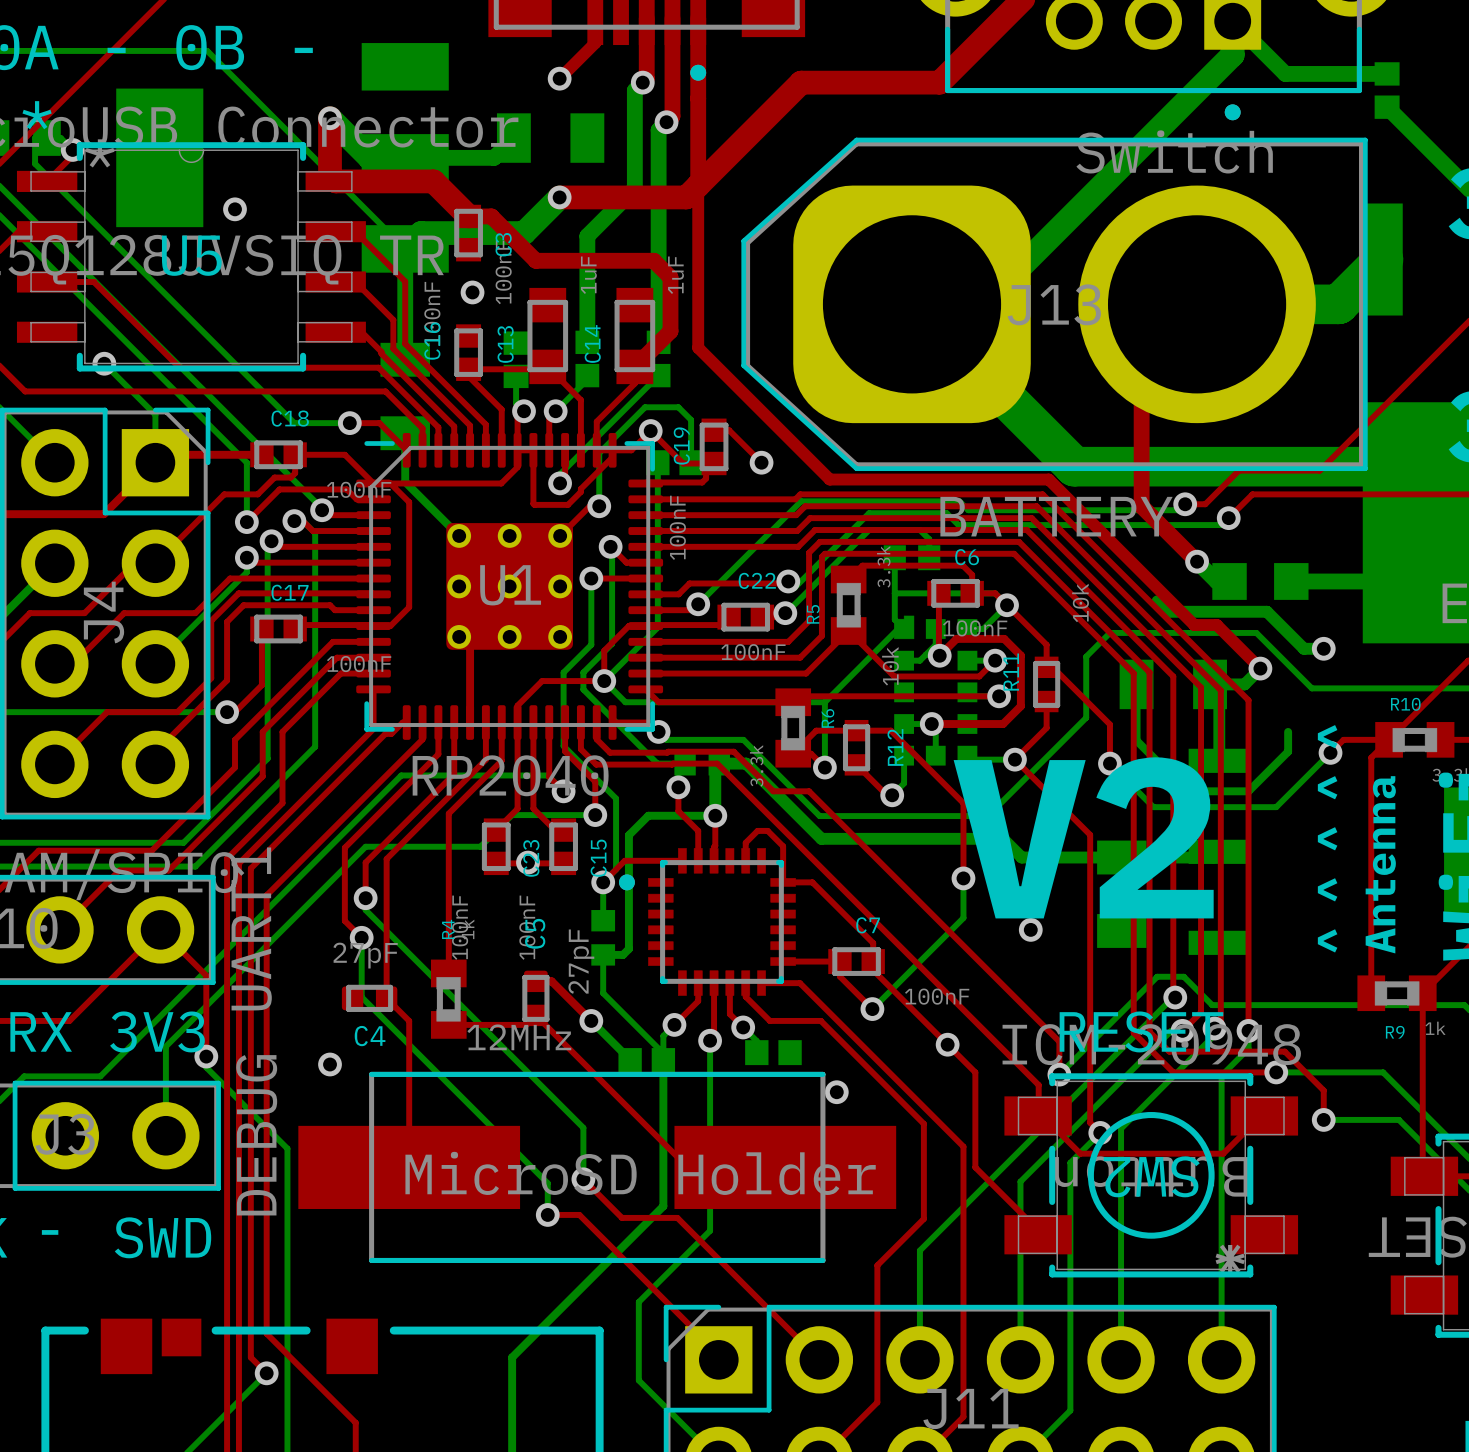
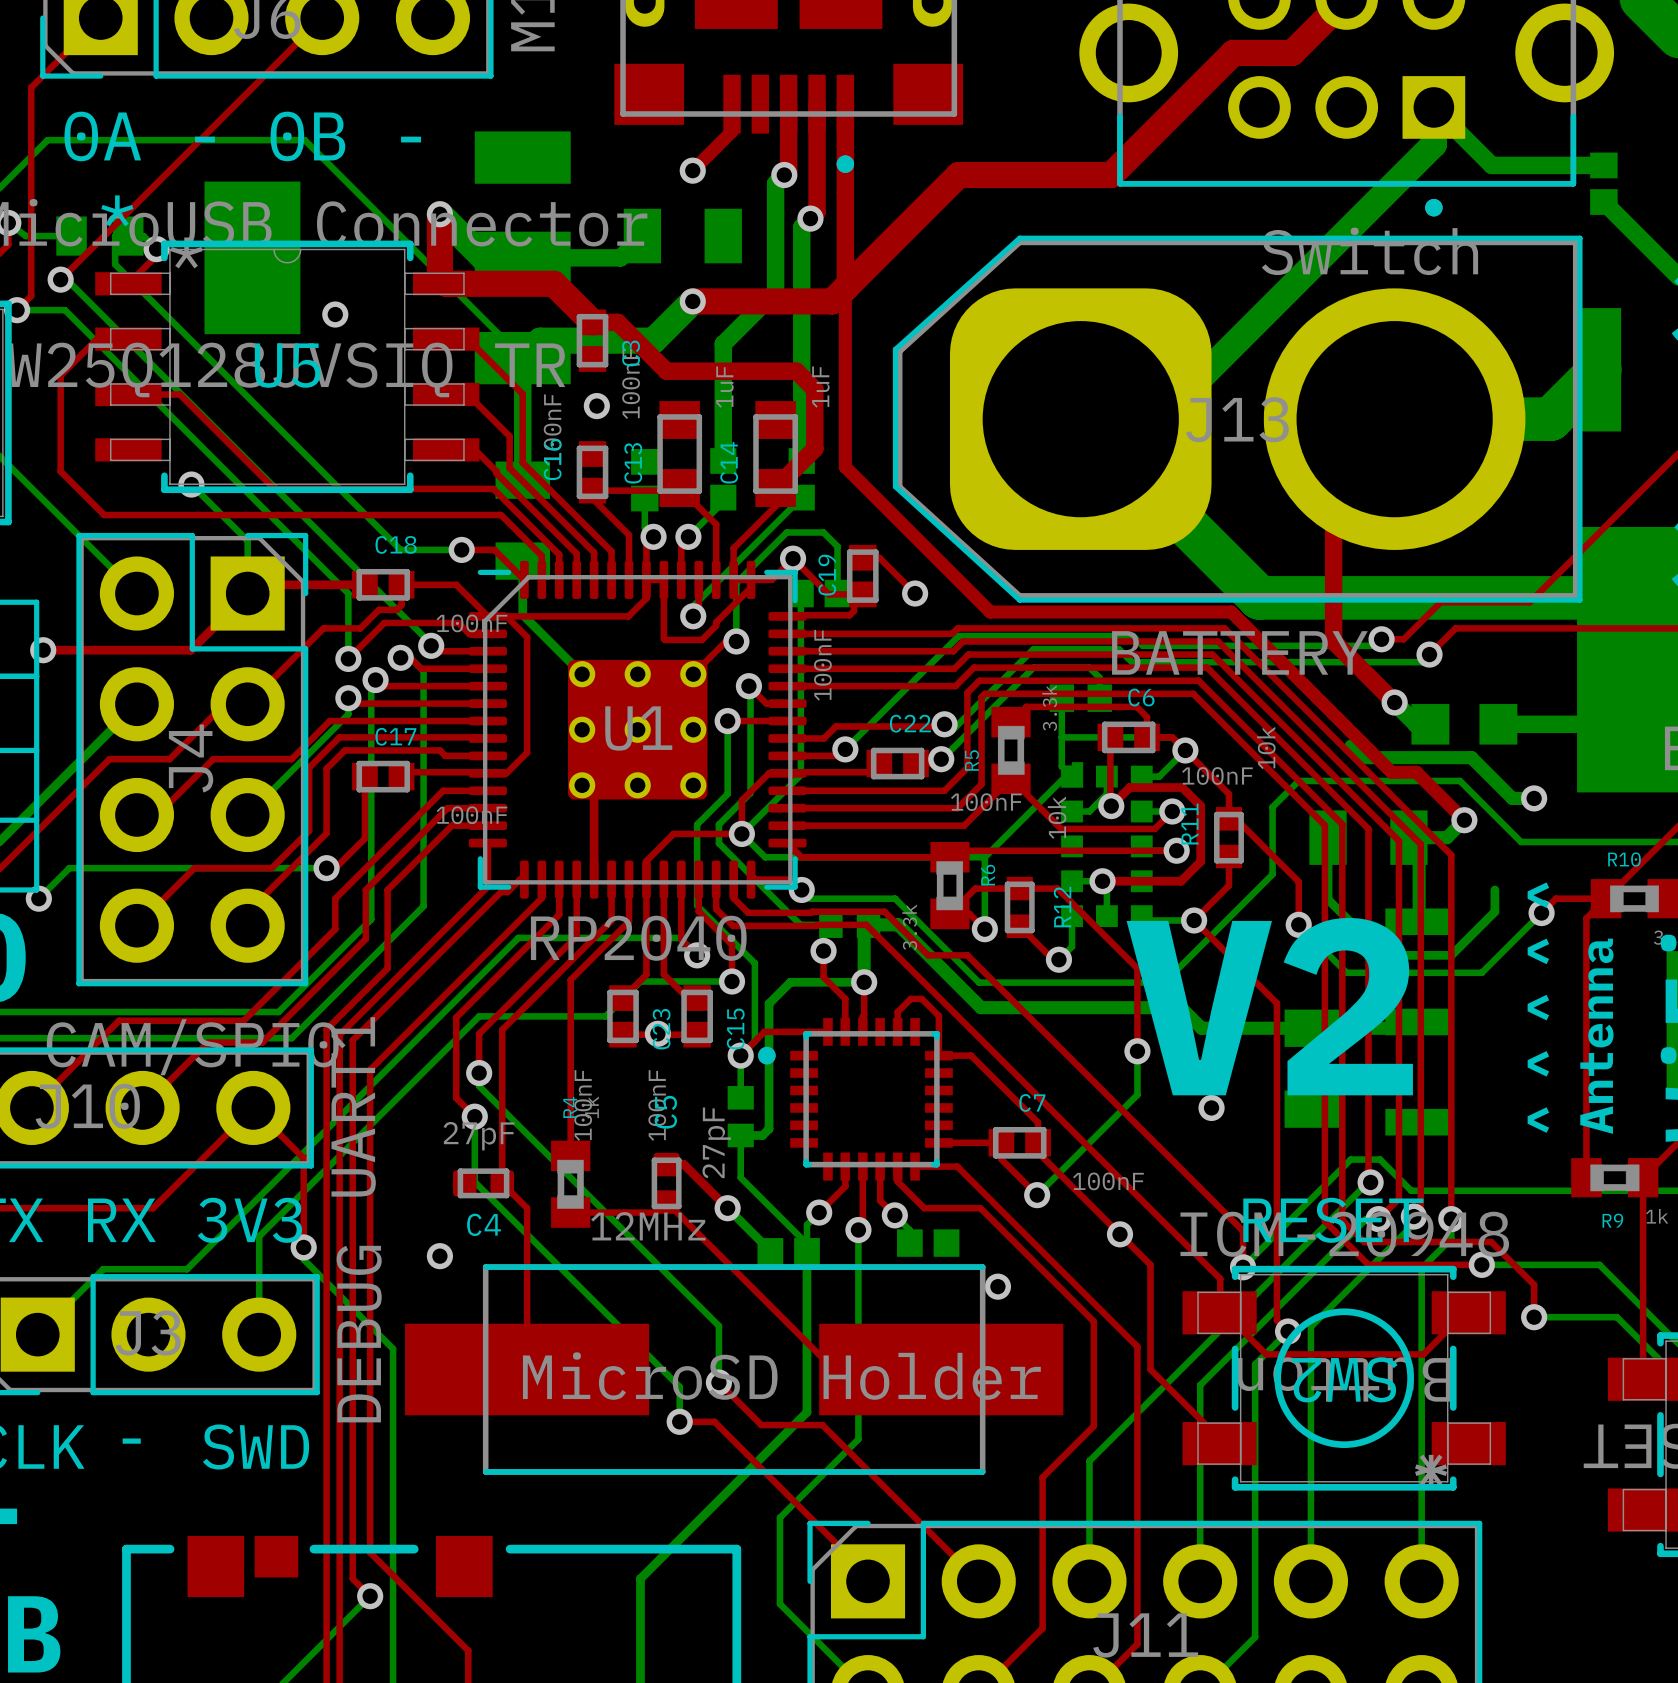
C6 value position: 100nF (975, 628) -> 100nF (1217, 775)
C22 value position: 100nF (753, 652) -> 100nF (986, 802)

